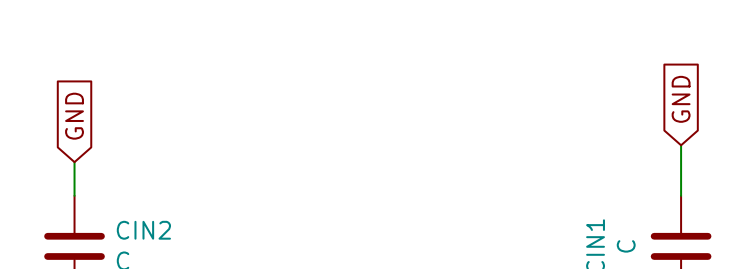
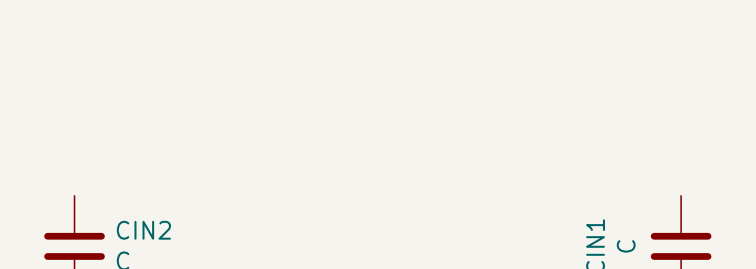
global label: GND (681, 99) -> none
global label: GND (74, 116) -> none
wire: (681, 145) (681, 195) -> none
wire: (74, 162) (74, 195) -> none

